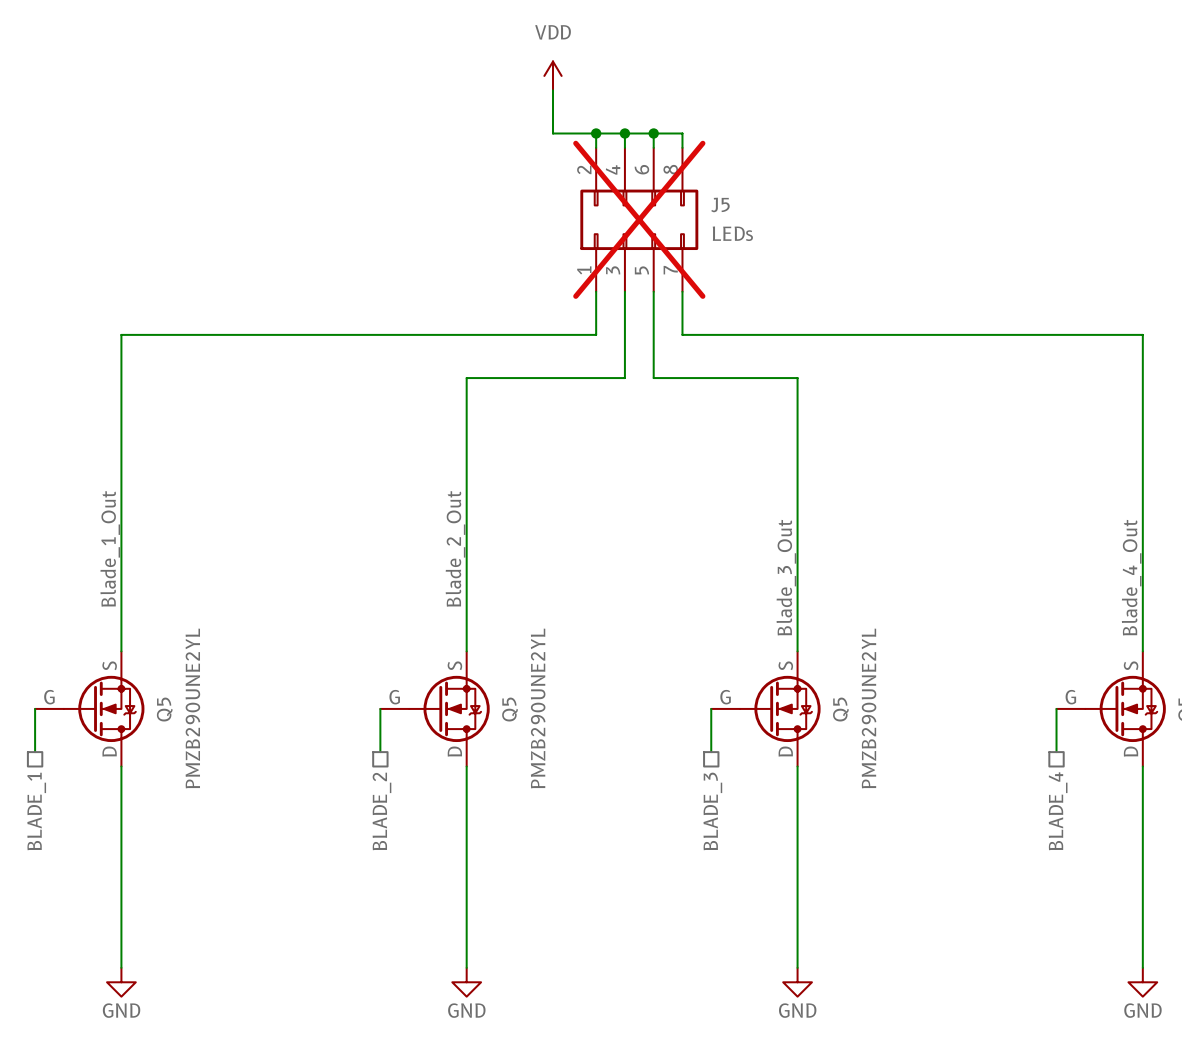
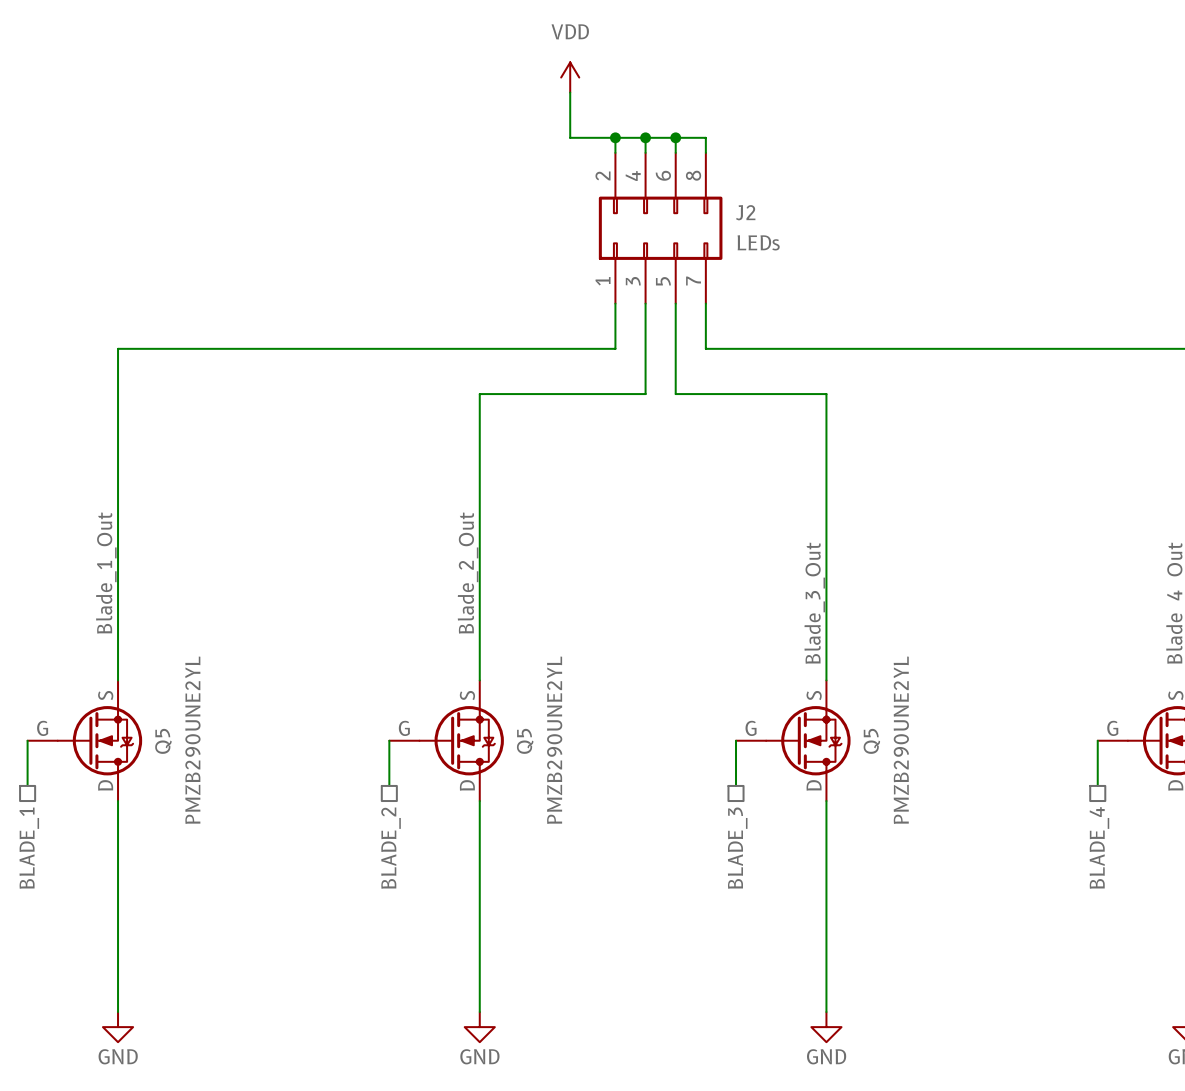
J5 name: J5 (720, 204) -> J2 (745, 212)
J5 do-not-place cross: (639, 219) -> none

